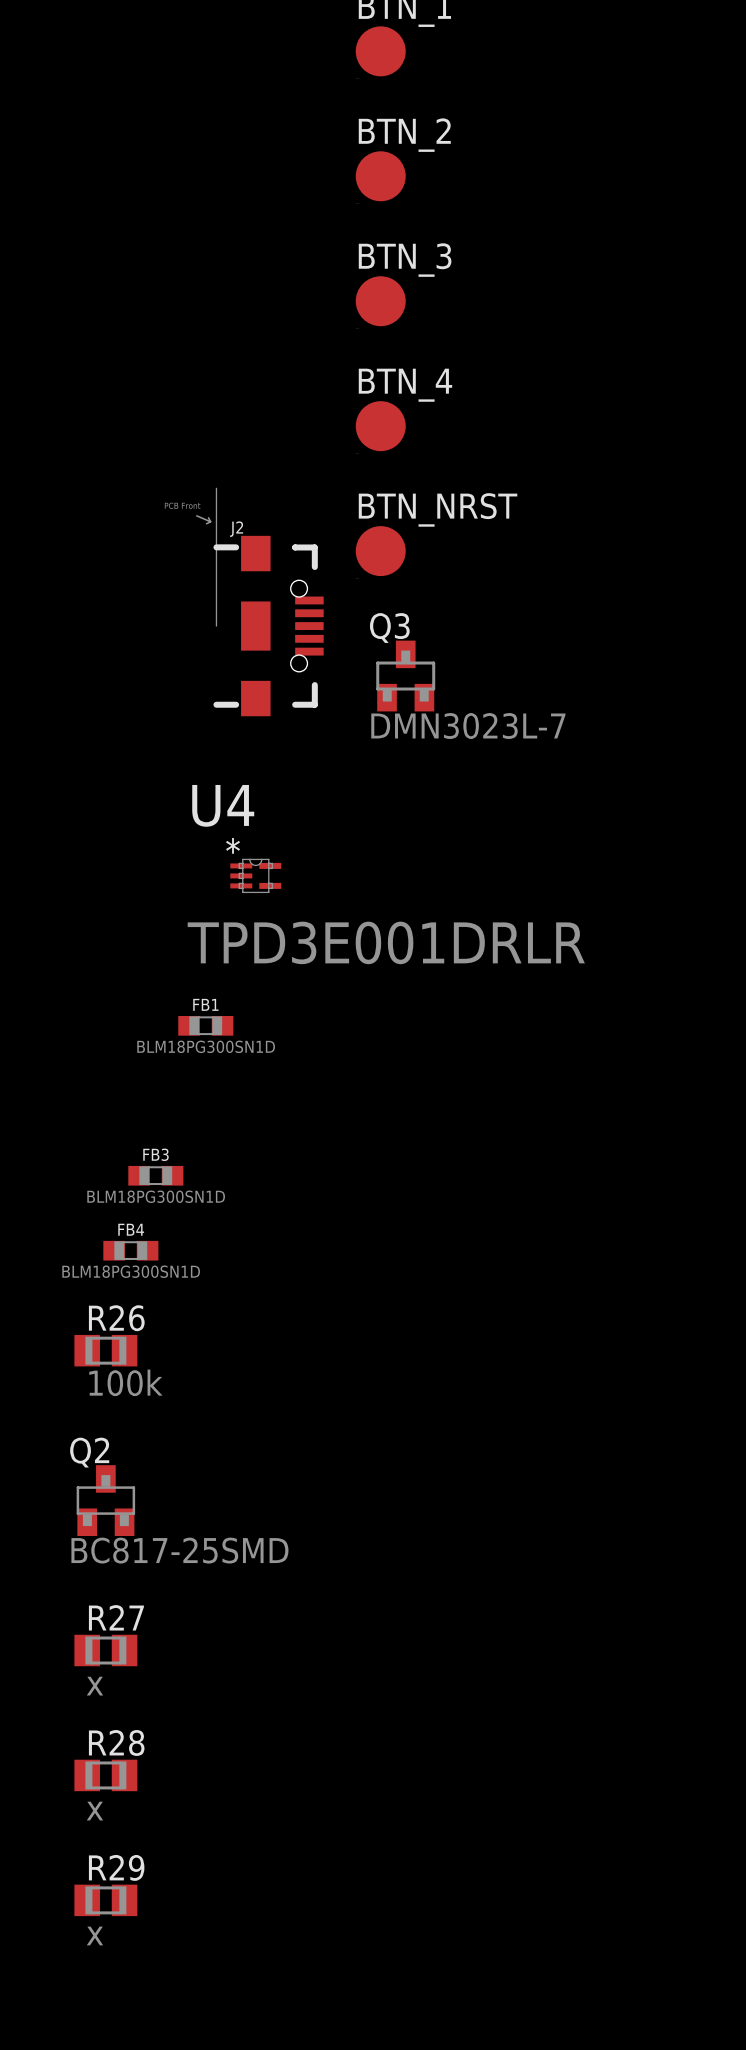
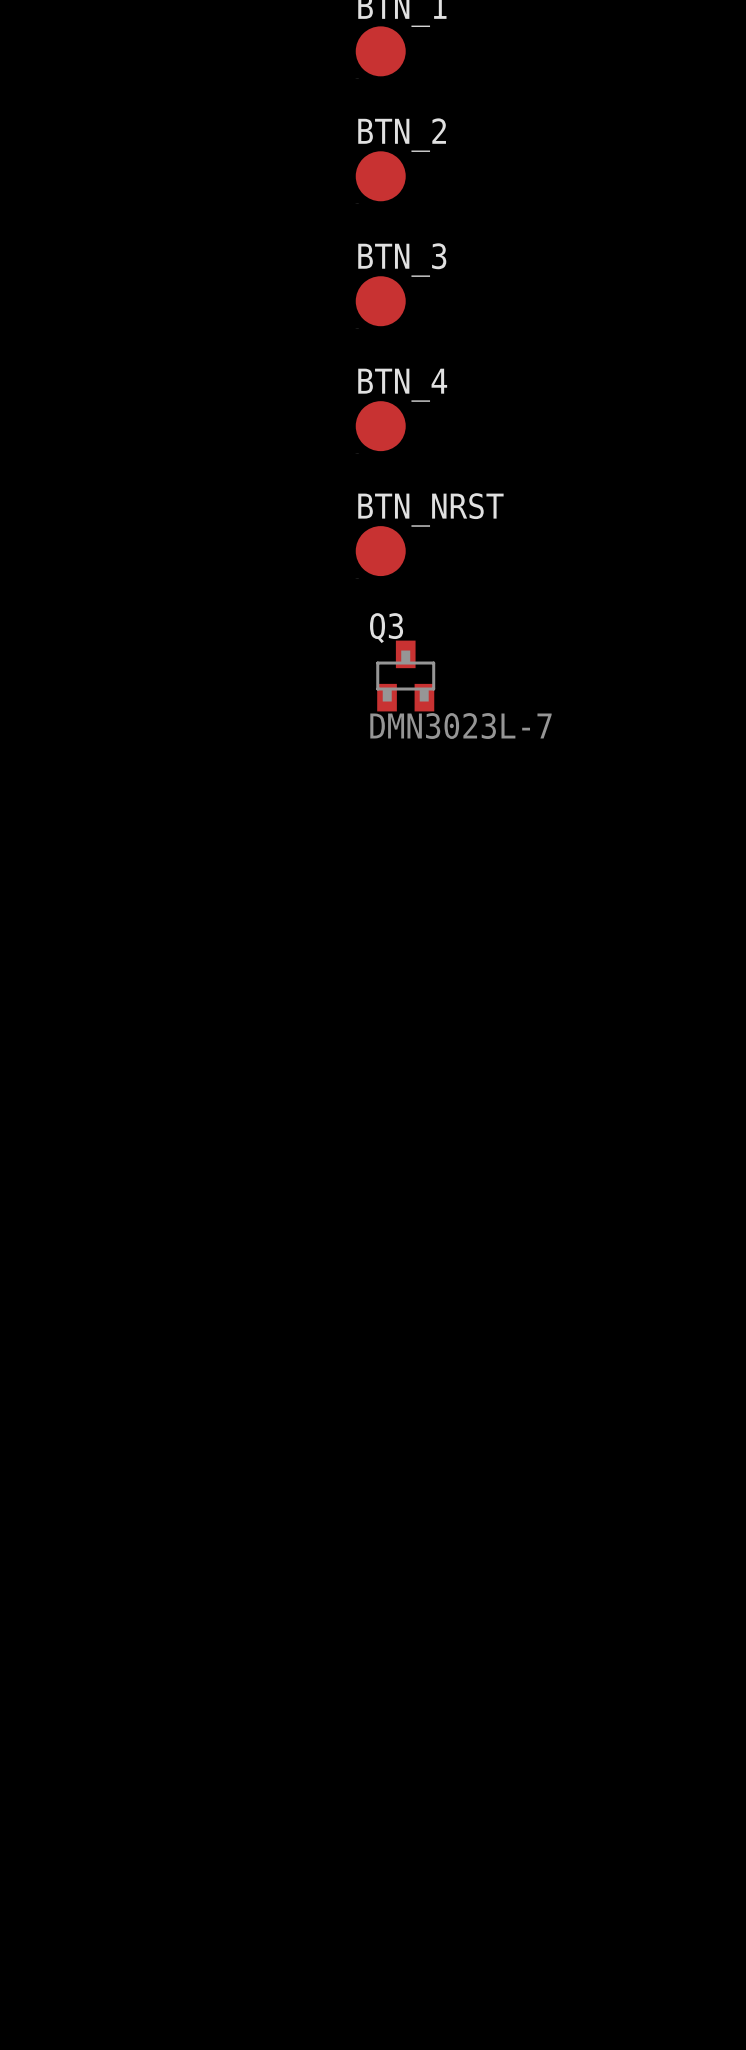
J2: (259, 602) -> none
U4: TPD3E001DRLR (255, 875) -> none
FB1: BLM18PG300SN1D (205, 1025) -> none
FB3: BLM18PG300SN1D (155, 1175) -> none
FB4: BLM18PG300SN1D (130, 1250) -> none
R26: 100k (105, 1350) -> none
Q2: BC817-25SMD (105, 1500) -> none
R27: x (105, 1650) -> none
R28: x (105, 1775) -> none
R29: x (105, 1900) -> none

